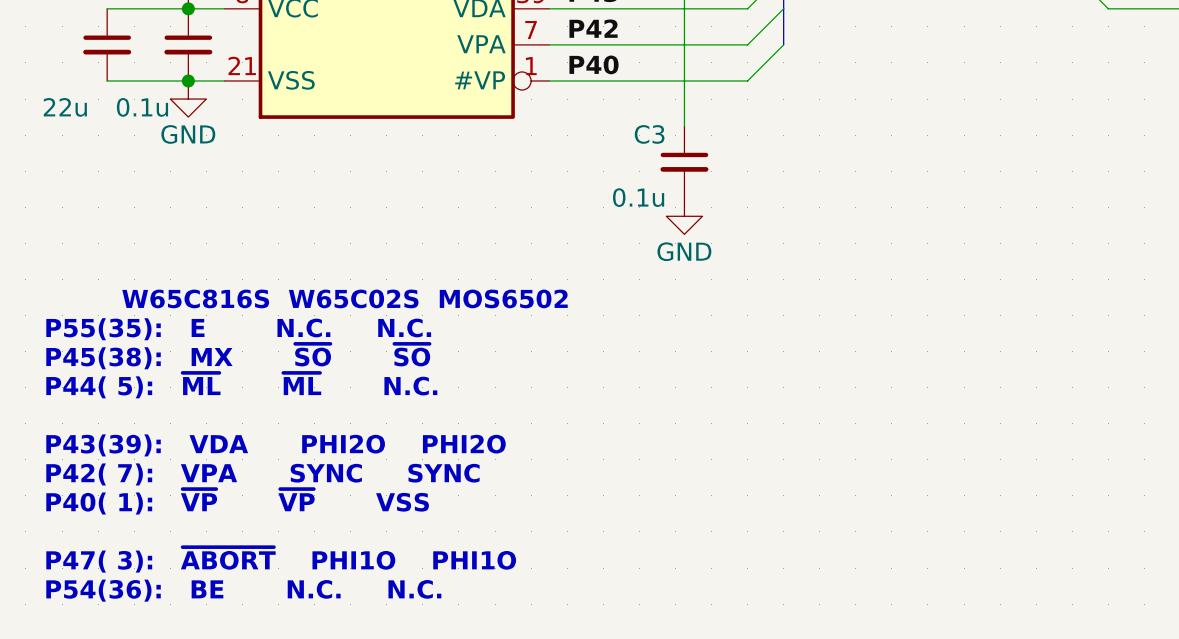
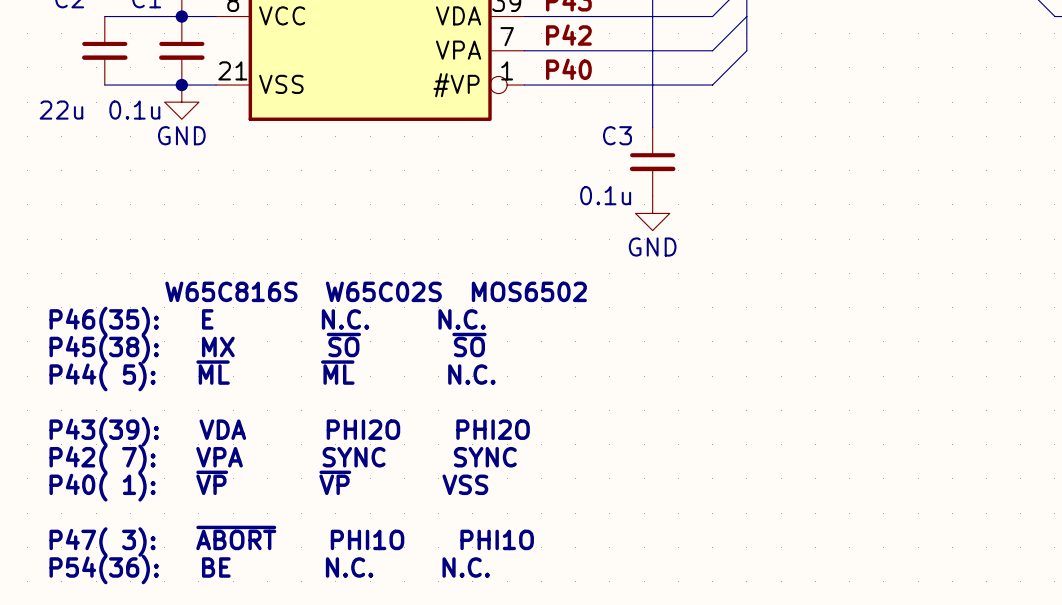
text: P55(35): E N.C. N.C. (238, 329) -> P46(35): E N.C. N.C. (267, 321)

